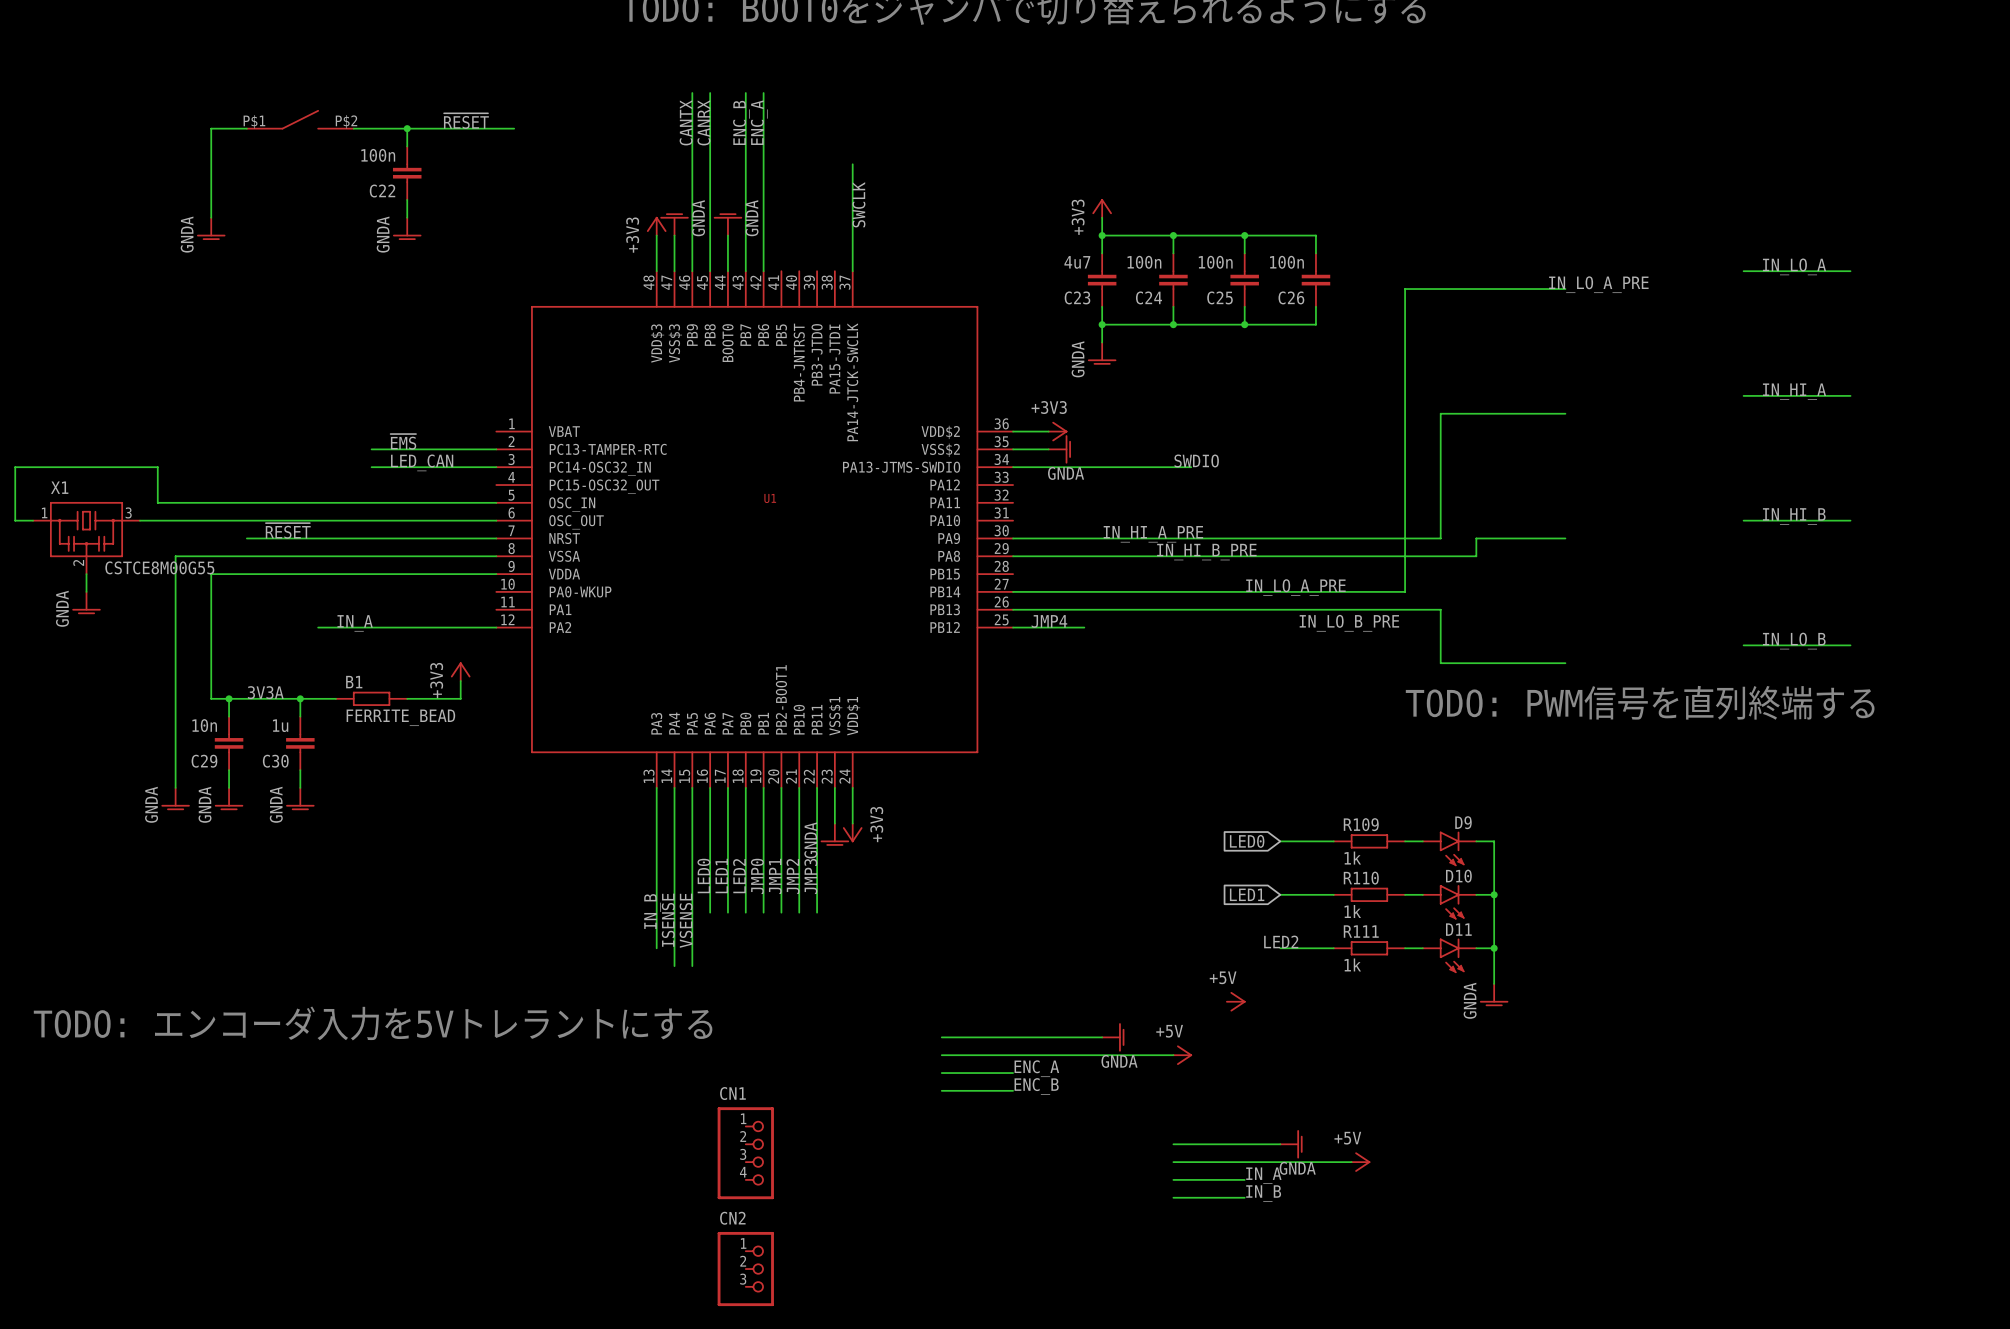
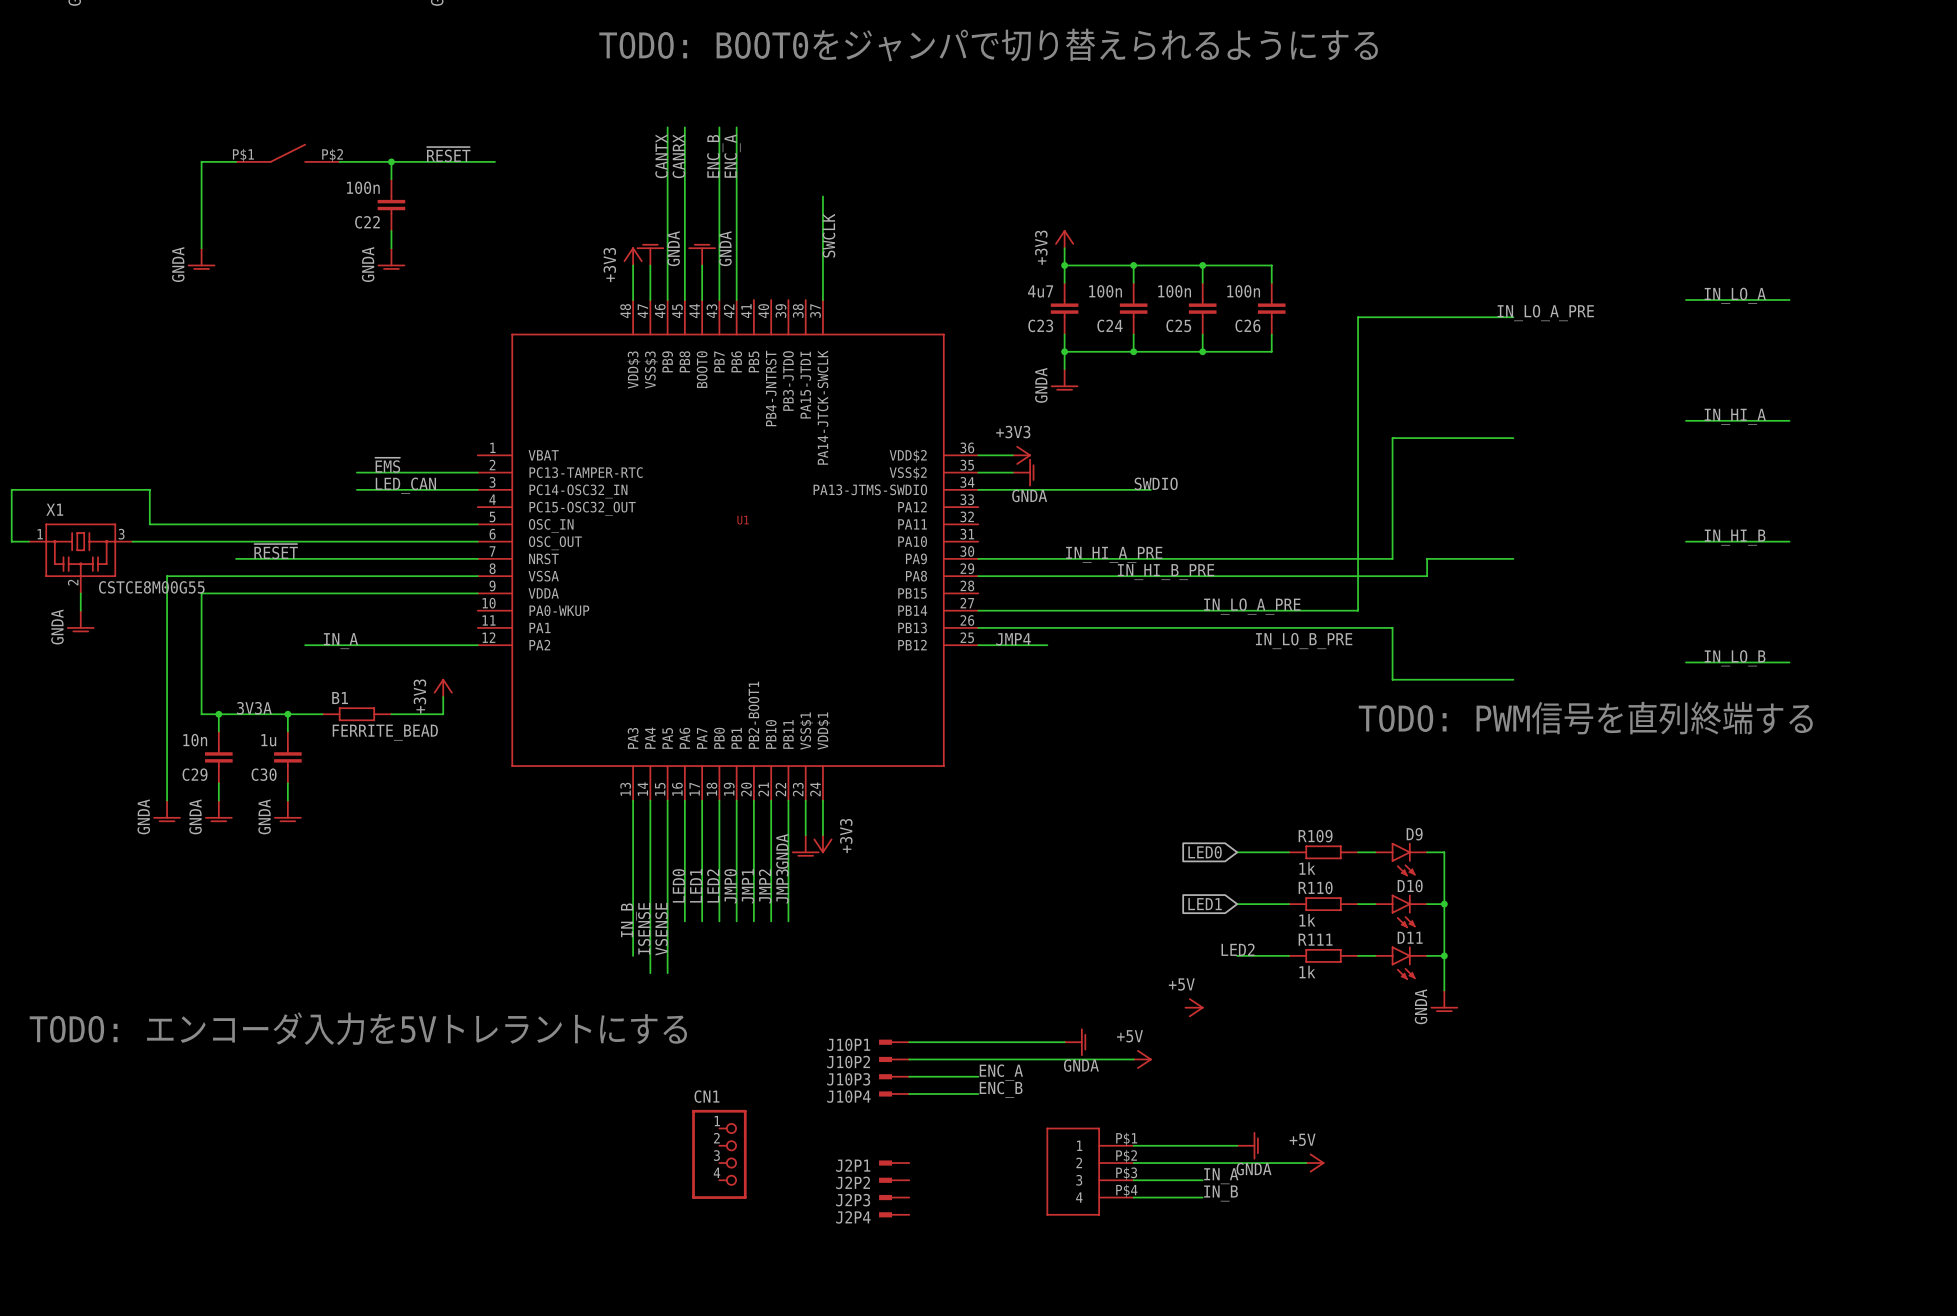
J10P1: none -> (894, 1042)
J10P2: none -> (894, 1059)
J10P3: none -> (894, 1076)
J10P4: none -> (894, 1093)
J2P1: none -> (894, 1163)
part: none -> (1090, 1171)
J2P2: none -> (894, 1180)
J2P3: none -> (894, 1197)
J2P4: none -> (894, 1214)
CN2: (745, 1269) -> none

